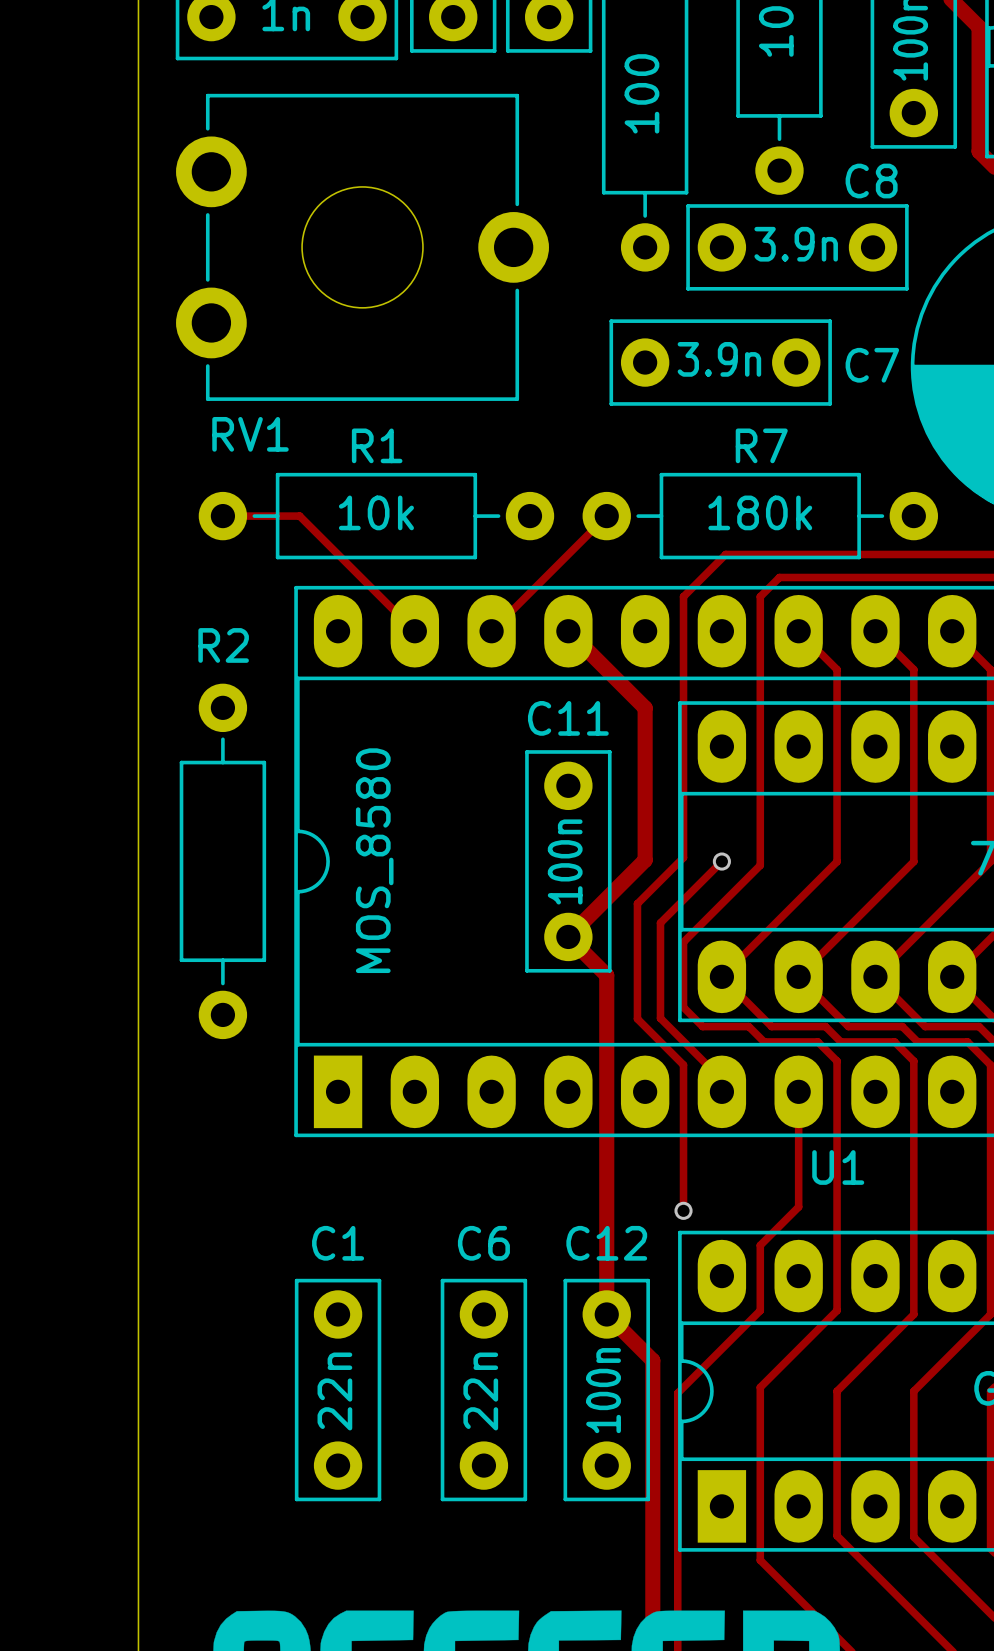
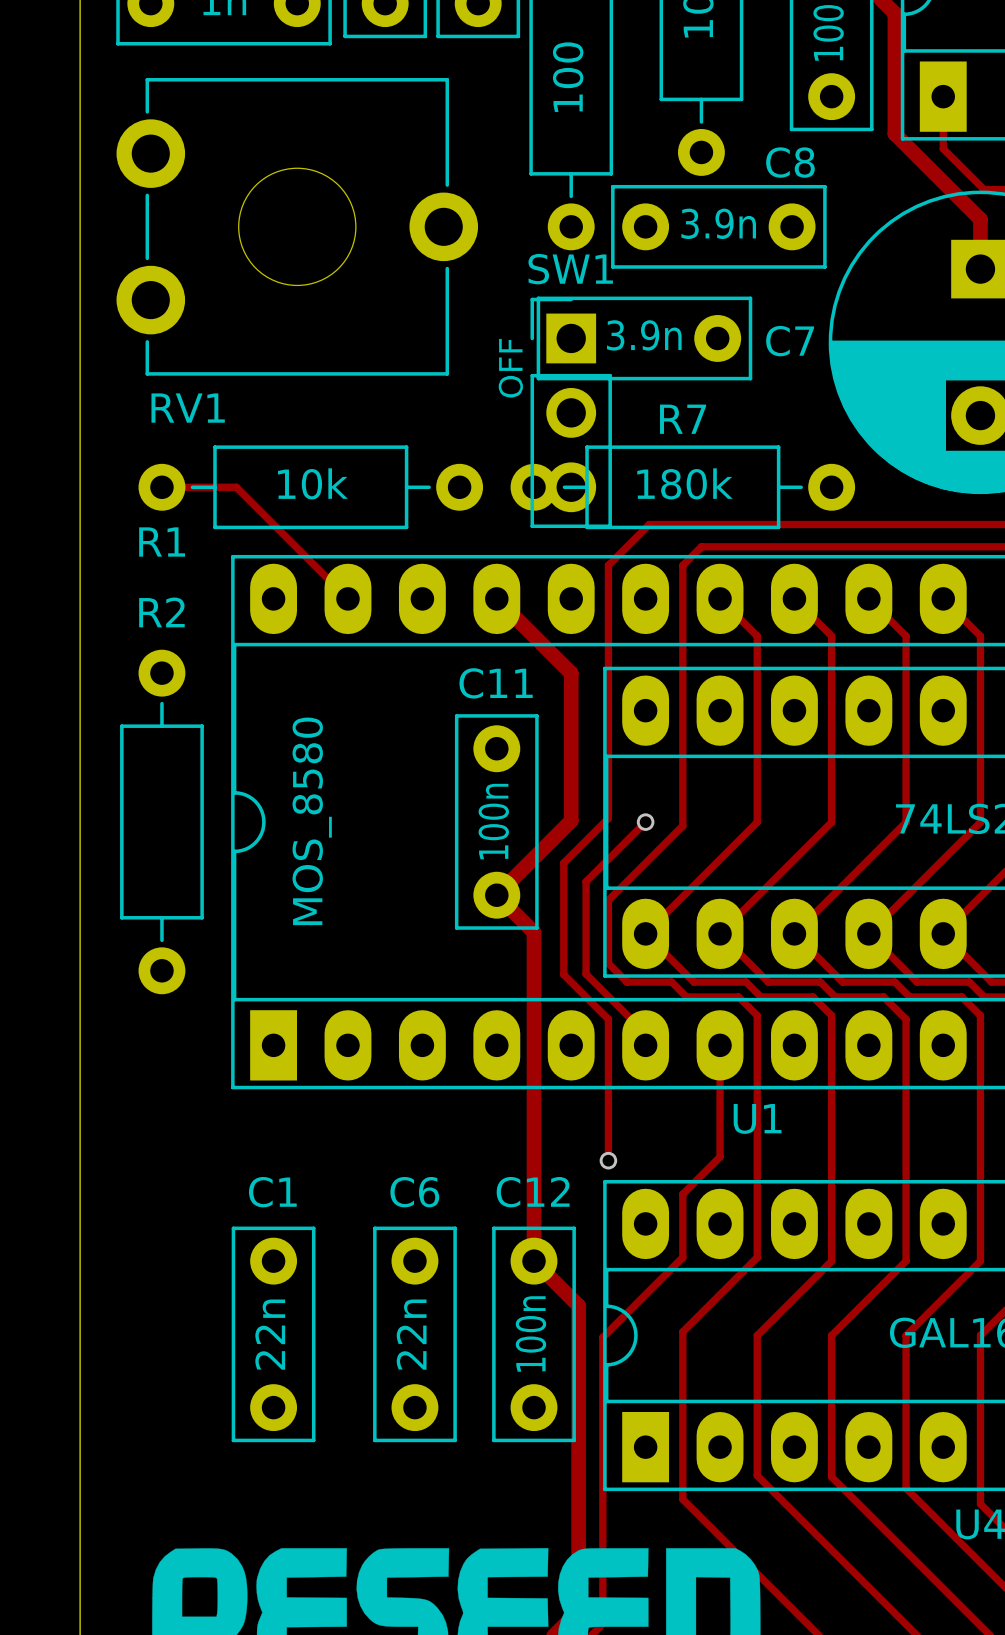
text: none -> OFF (510, 368)
SW1: none -> (571, 412)
R1 name position: R1 (377, 445) -> R1 (162, 541)
track: (606, 516) (491, 631) -> none

